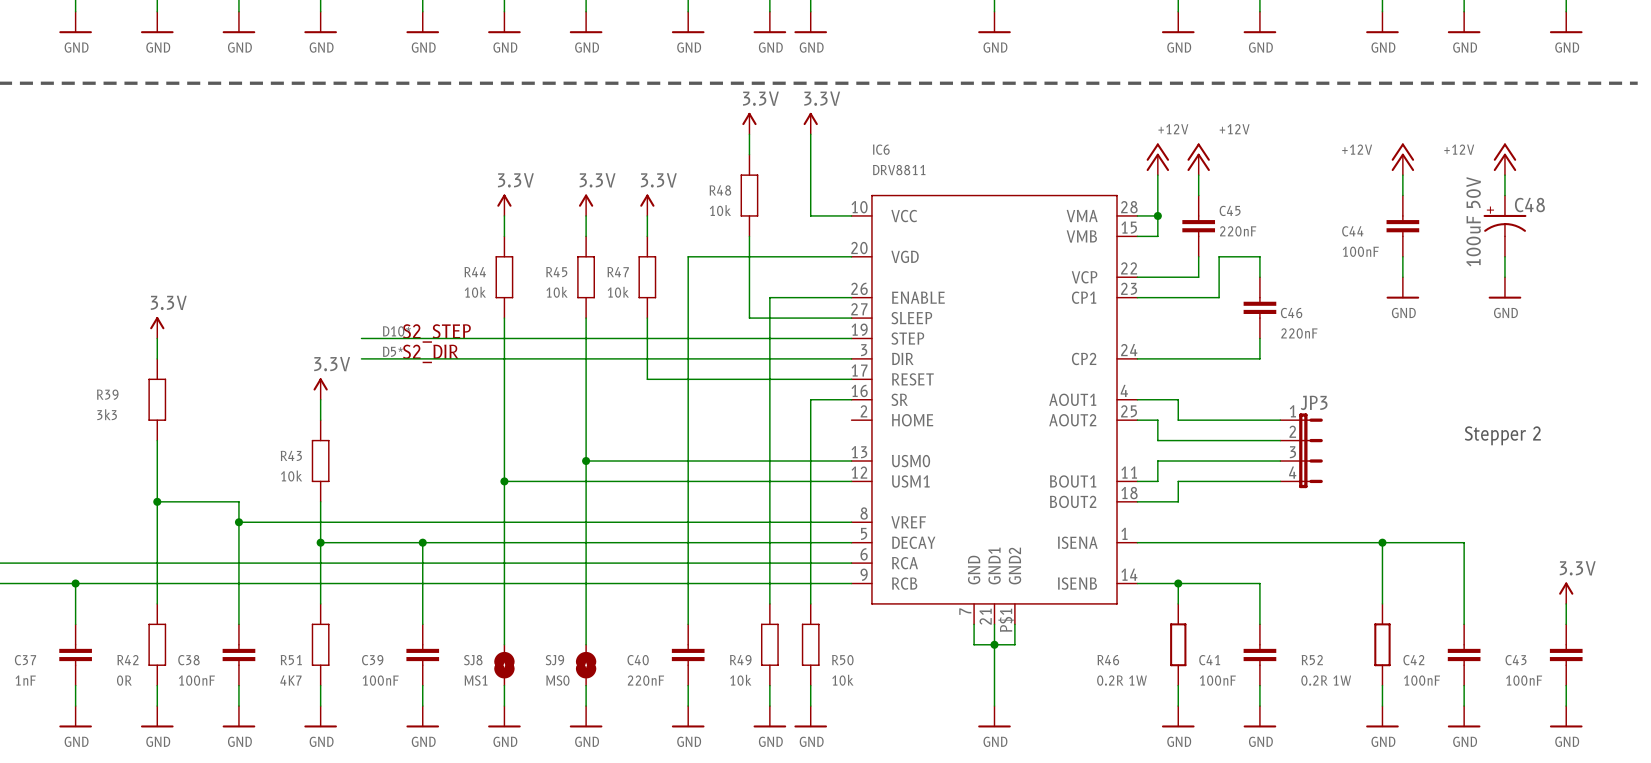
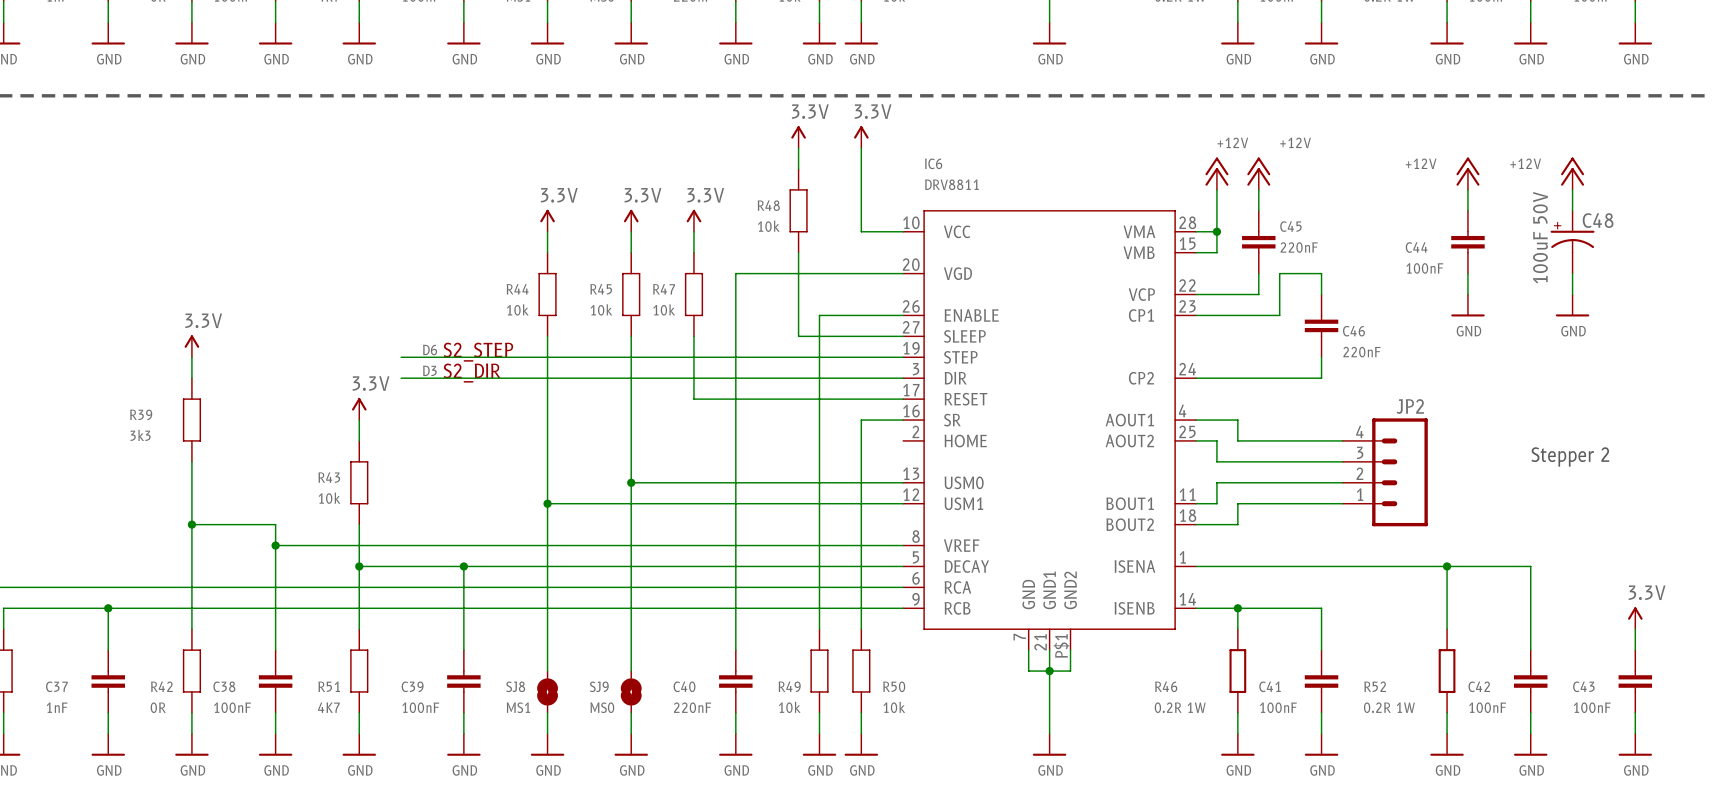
label: D10* (396, 331) -> D6 (430, 350)
label: D5* (392, 351) -> D3 (429, 370)
JP3: (1301, 450) -> none
JP2: none -> (1385, 472)

